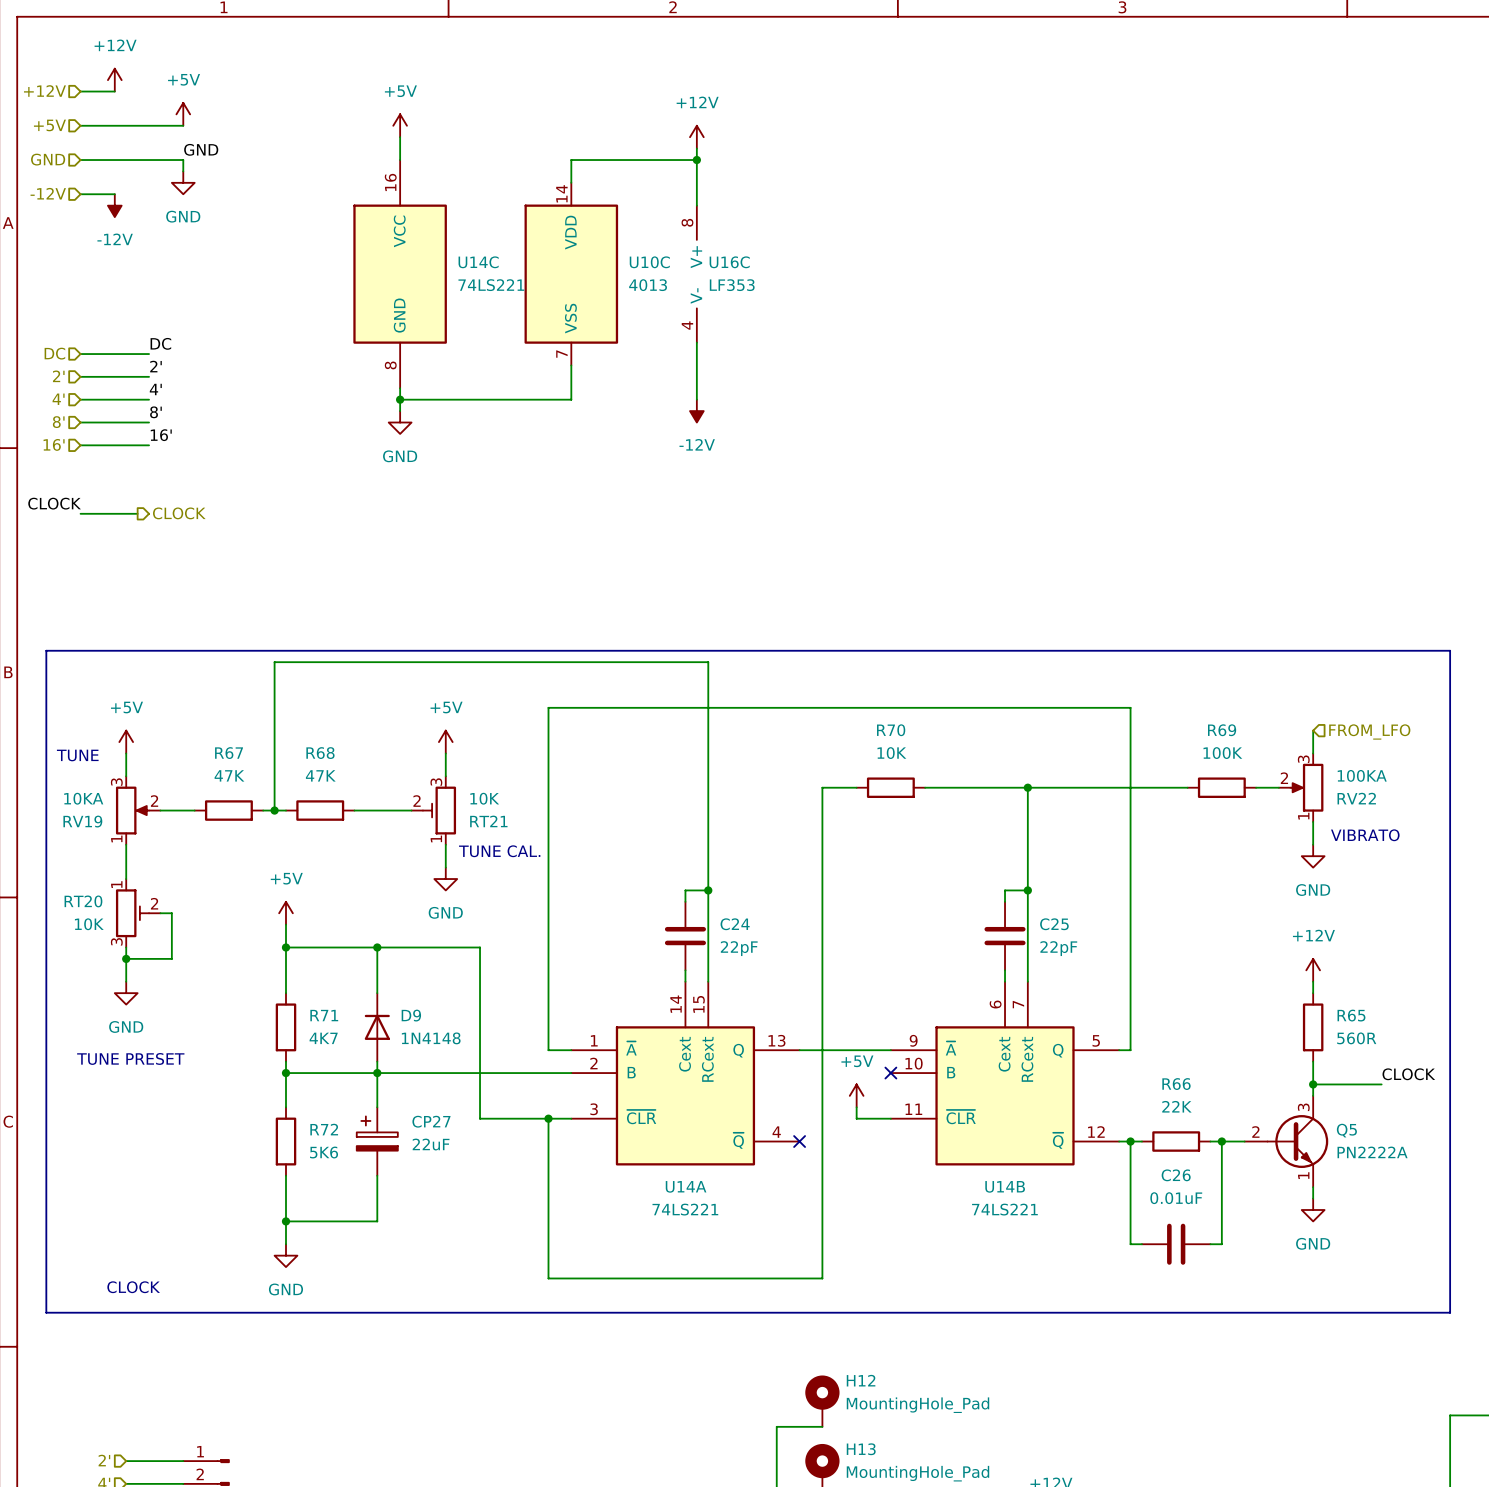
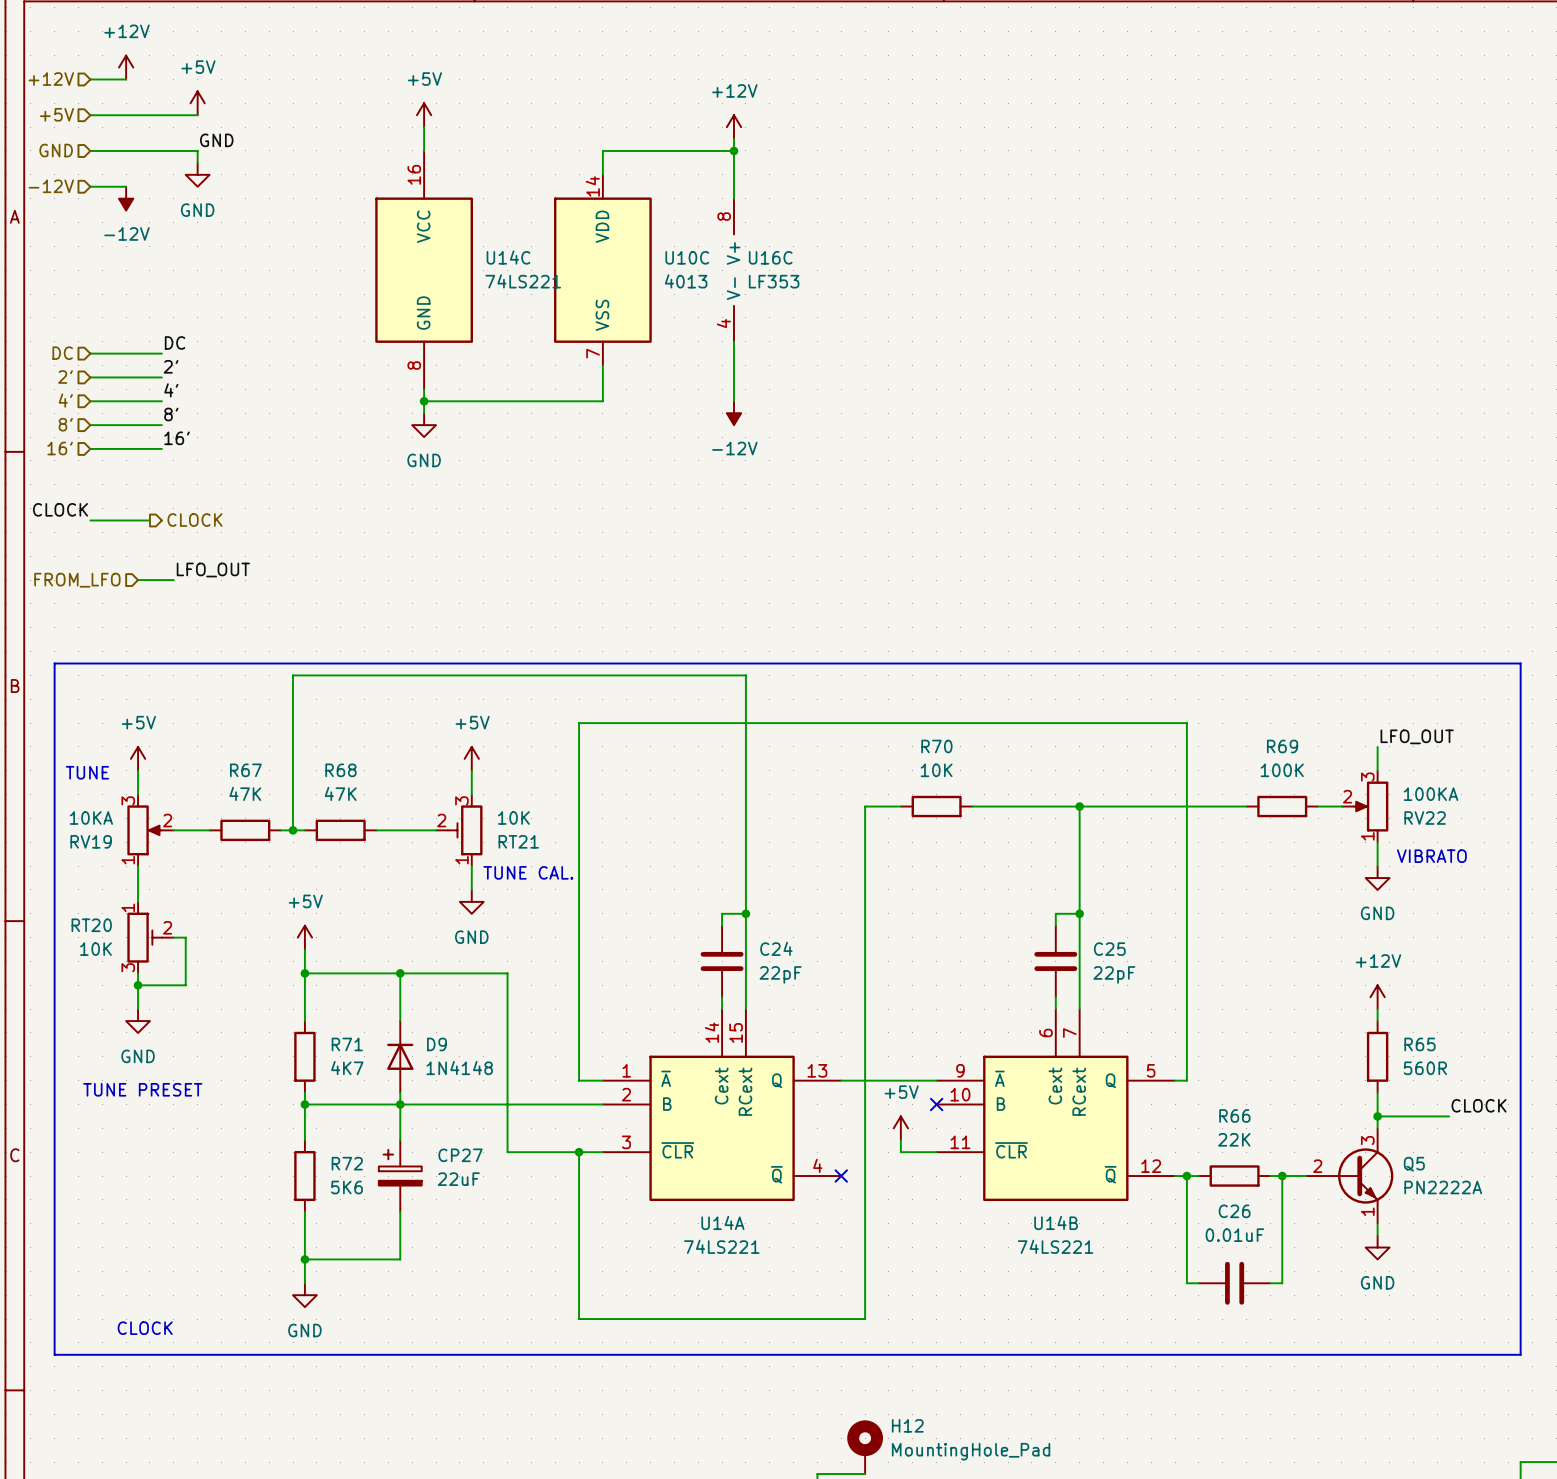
label: none -> LFO_OUT (213, 570)
wire: none -> (138, 580) (173, 580)
hierarchical label: none -> FROM_LFO (77, 580)
label: none -> LFO_OUT (1417, 736)
hierarchical label: FROM_LFO (1369, 731) -> none

